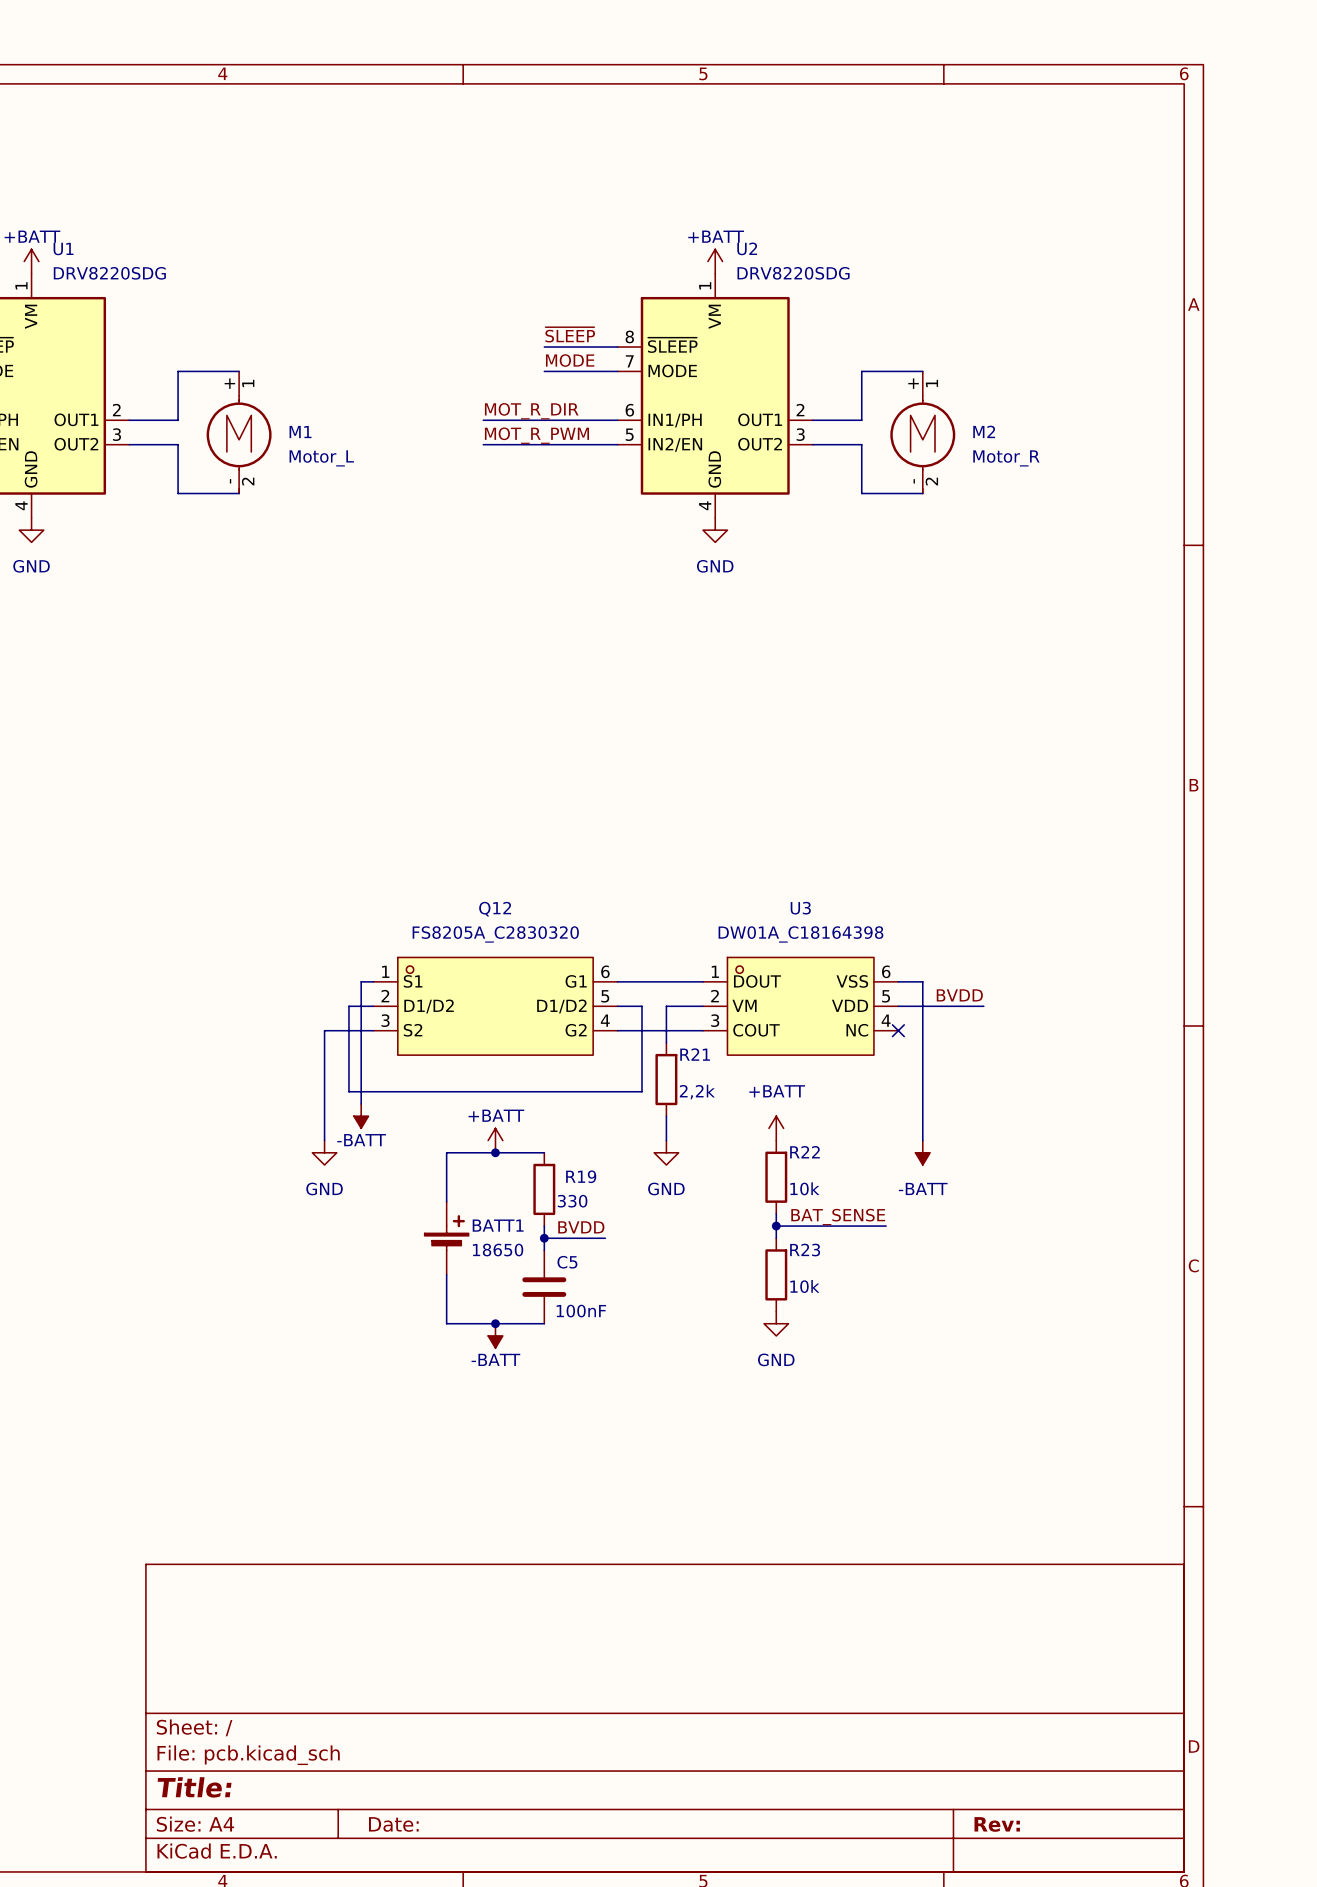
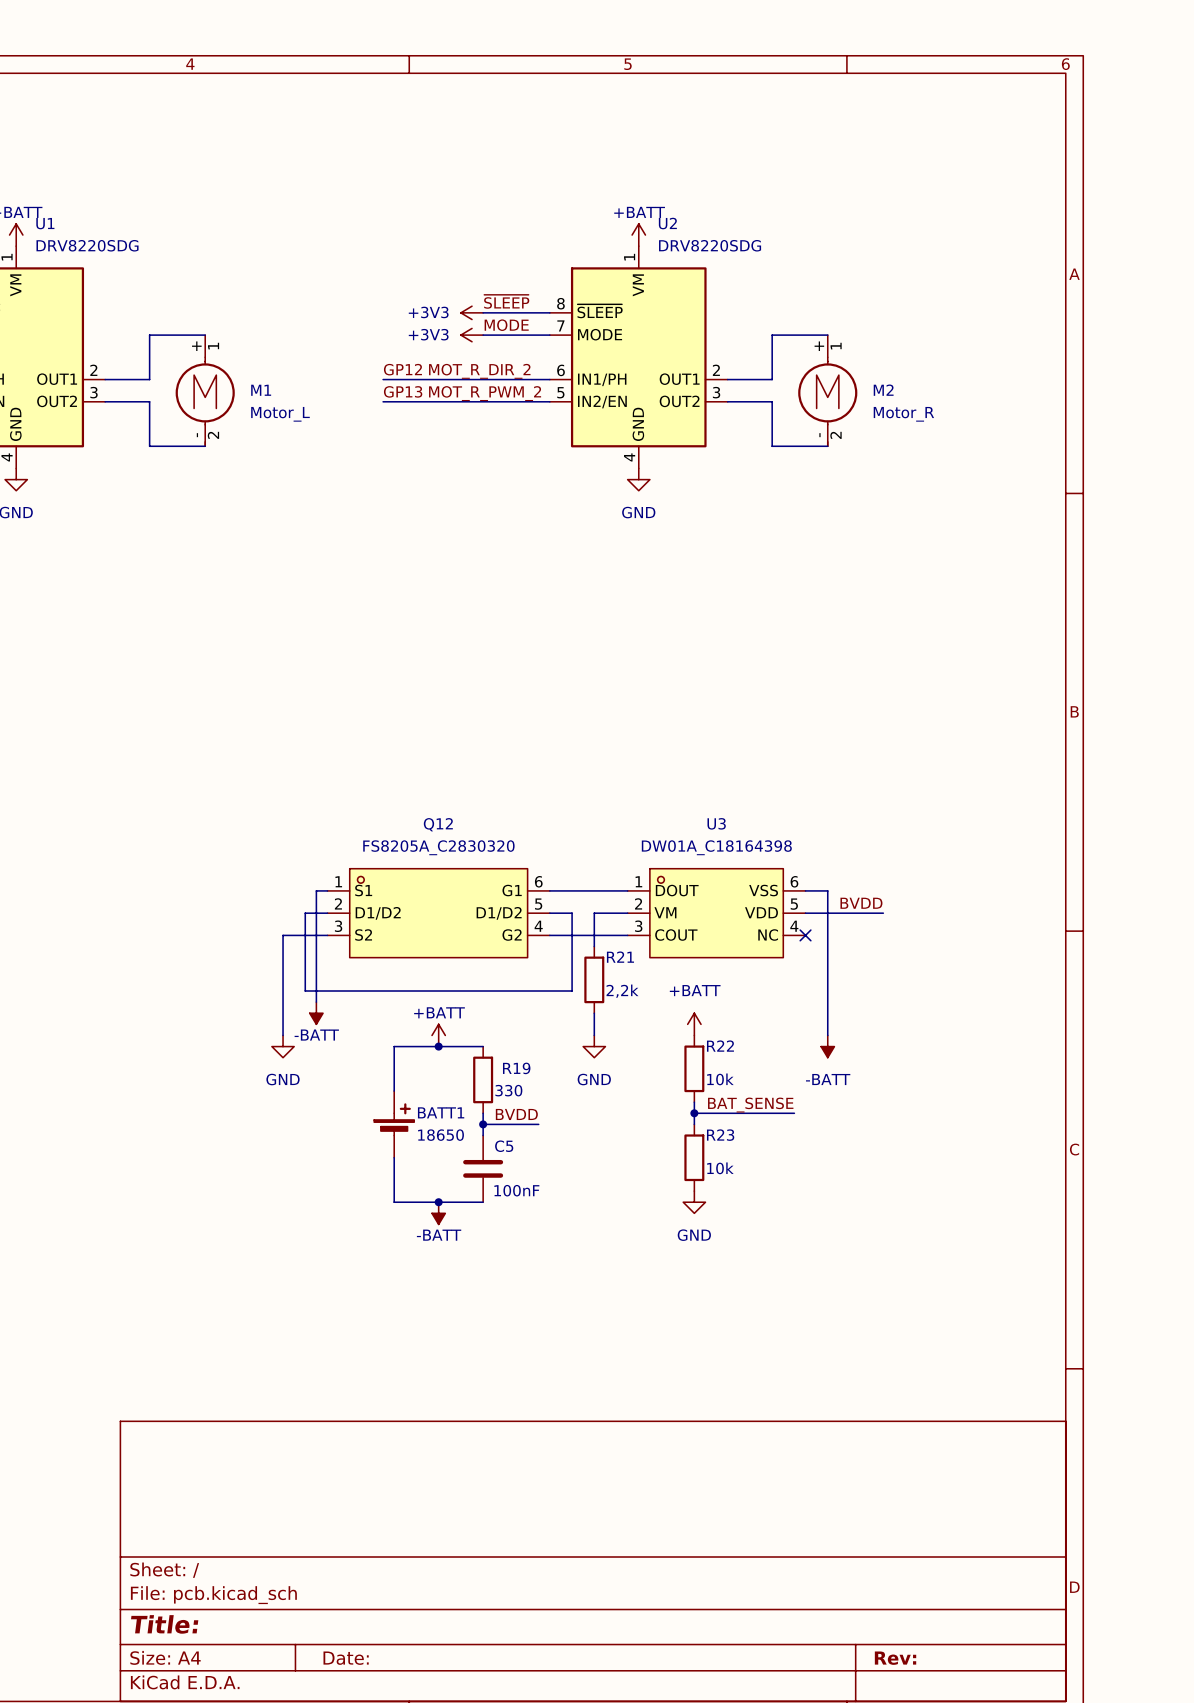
power symbol: none -> +3V3 (472, 312)
power symbol: none -> +3V3 (472, 335)
label: none -> GP12 (402, 369)
label: MOT_R_DIR (531, 411) -> MOT_R_DIR_2 (479, 371)
wire: none -> (383, 379) (427, 379)
label: none -> GP13 (403, 391)
label: MOT_R_PWM (536, 435) -> MOT_R_PWM_2 (485, 393)
wire: none -> (383, 401) (427, 401)

